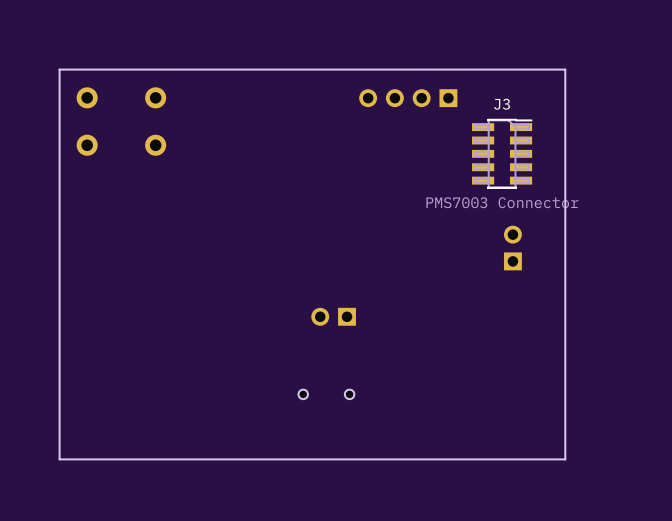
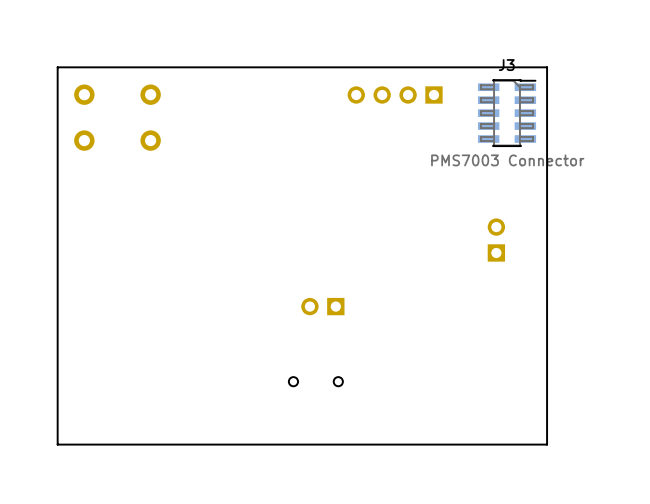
J3 position: (502, 153) -> (507, 113)

